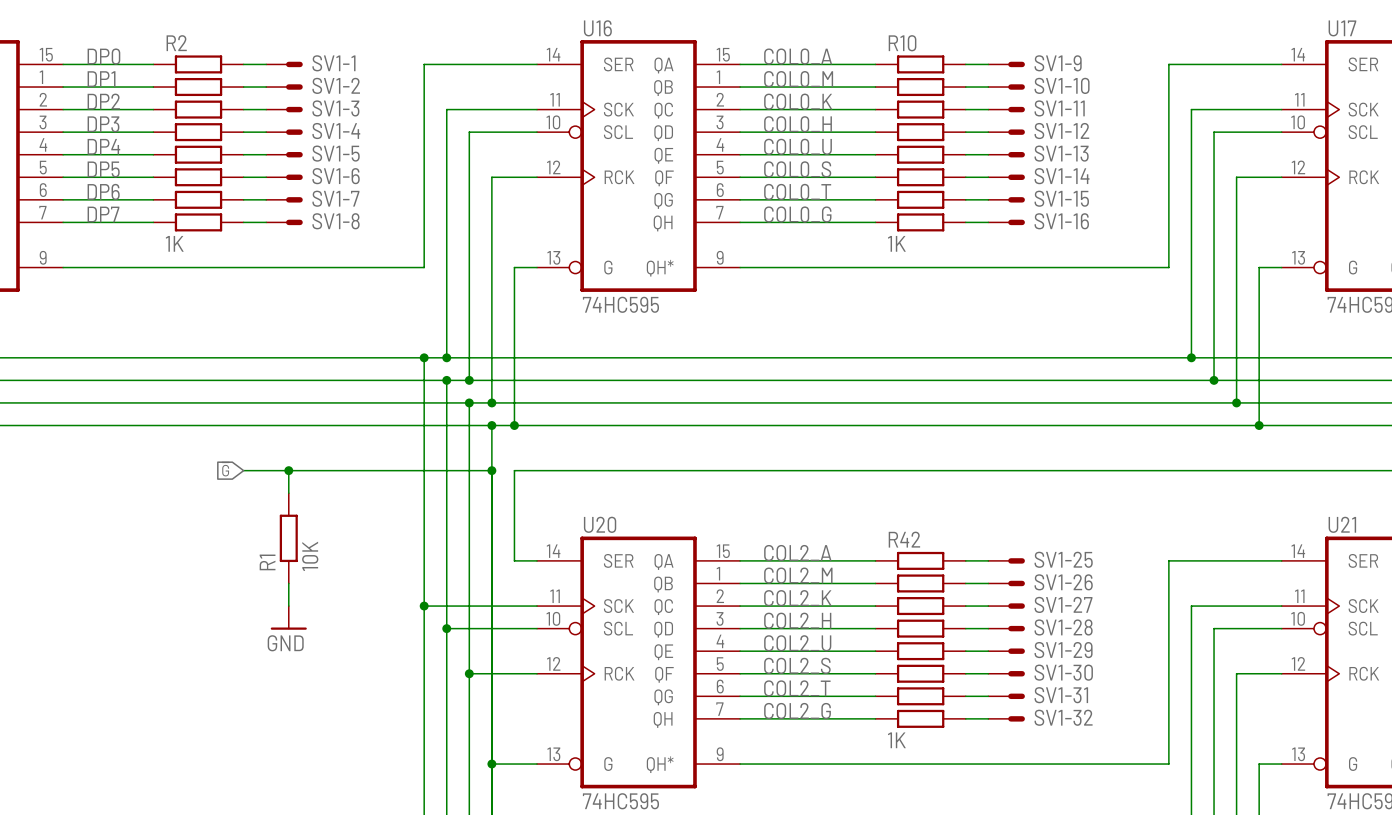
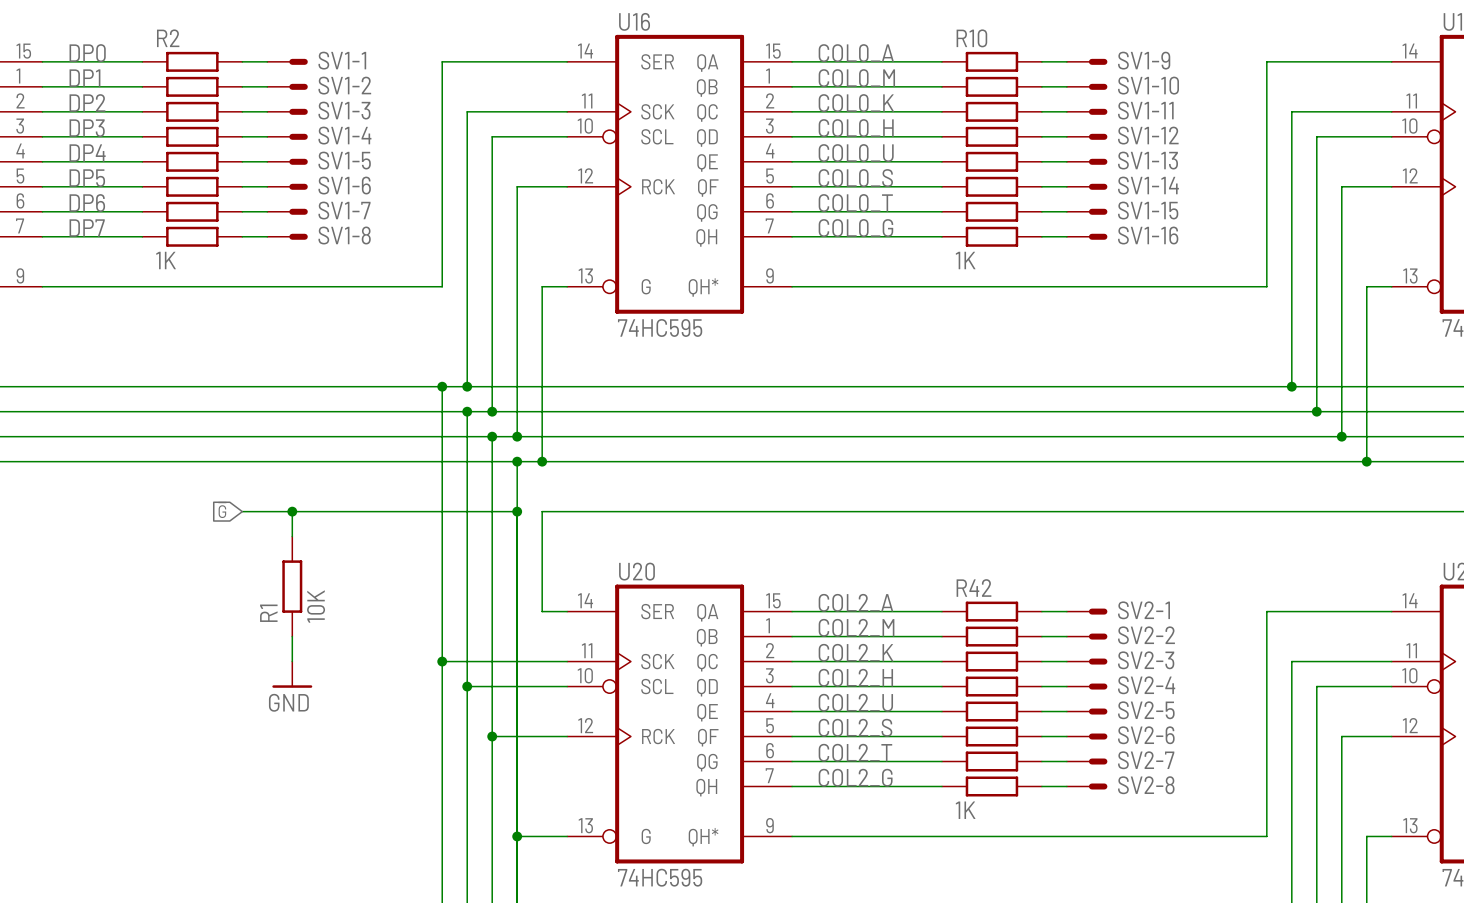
SV1-25 name: SV1-25 (1063, 559) -> SV2-1 (1144, 610)
SV1-26 name: SV1-26 (1063, 582) -> SV2-2 (1146, 635)
SV1-27 name: SV1-27 (1063, 604) -> SV2-3 (1146, 660)
SV1-28 name: SV1-28 (1063, 627) -> SV2-4 (1146, 685)
SV1-29 name: SV1-29 (1063, 650) -> SV2-5 (1146, 710)
SV1-30 name: SV1-30 (1063, 672) -> SV2-6 (1146, 735)
SV1-31 name: SV1-31 (1061, 695) -> SV2-7 (1146, 760)
SV1-32 name: SV1-32 (1063, 717) -> SV2-8 (1146, 785)

